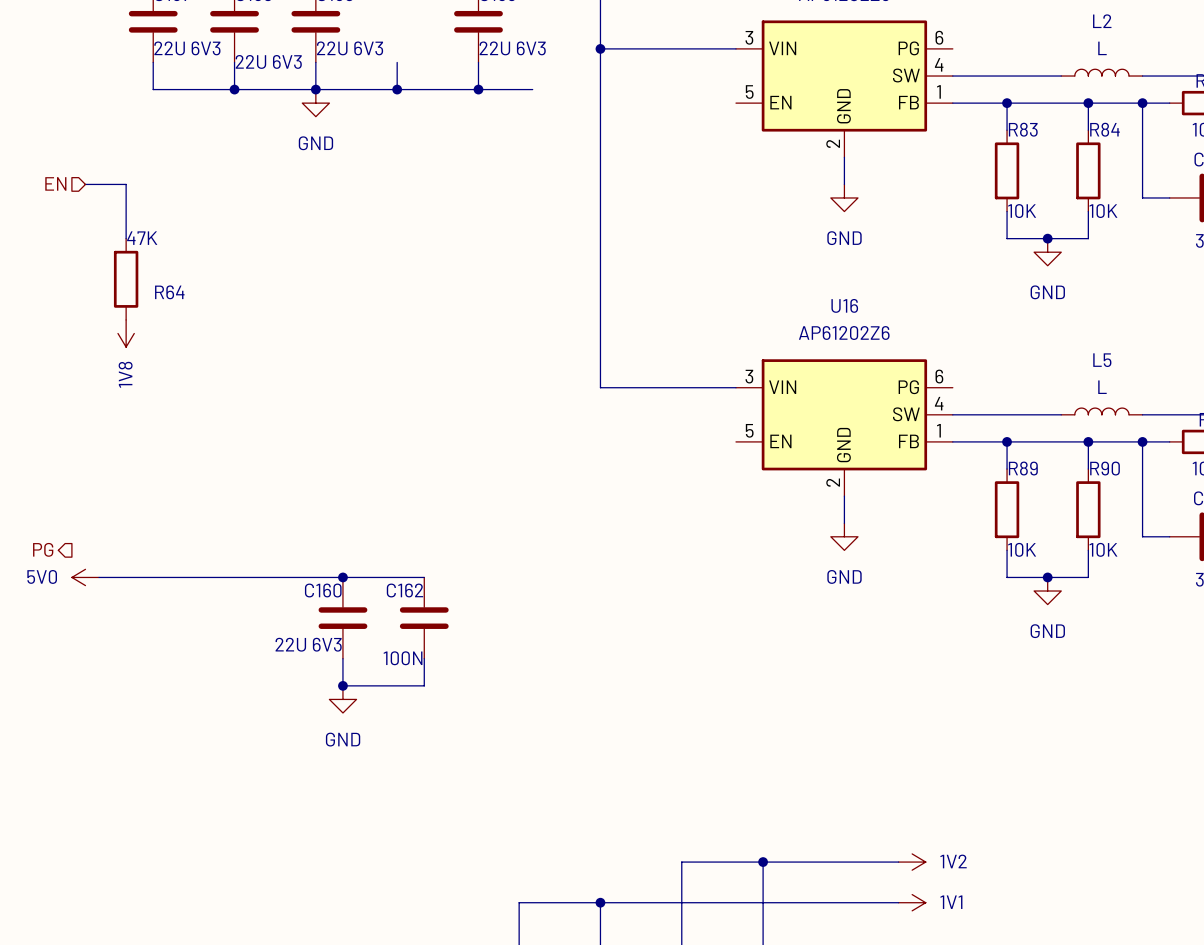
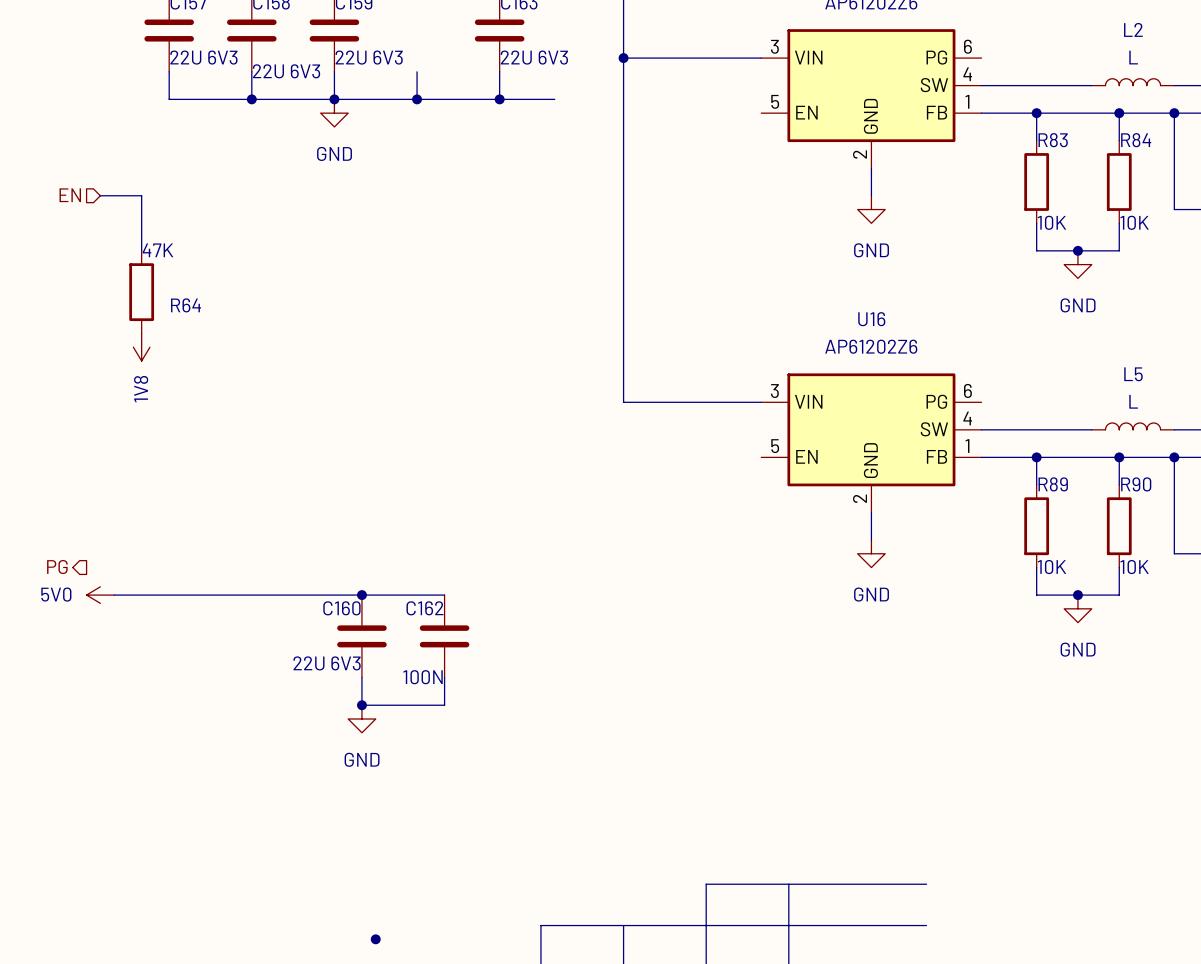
junction: (763, 862) -> none
power symbol: 1V2 (912, 862) -> none
junction: (600, 902) -> none
power symbol: 1V1 (912, 902) -> none
junction: none -> (375, 939)

